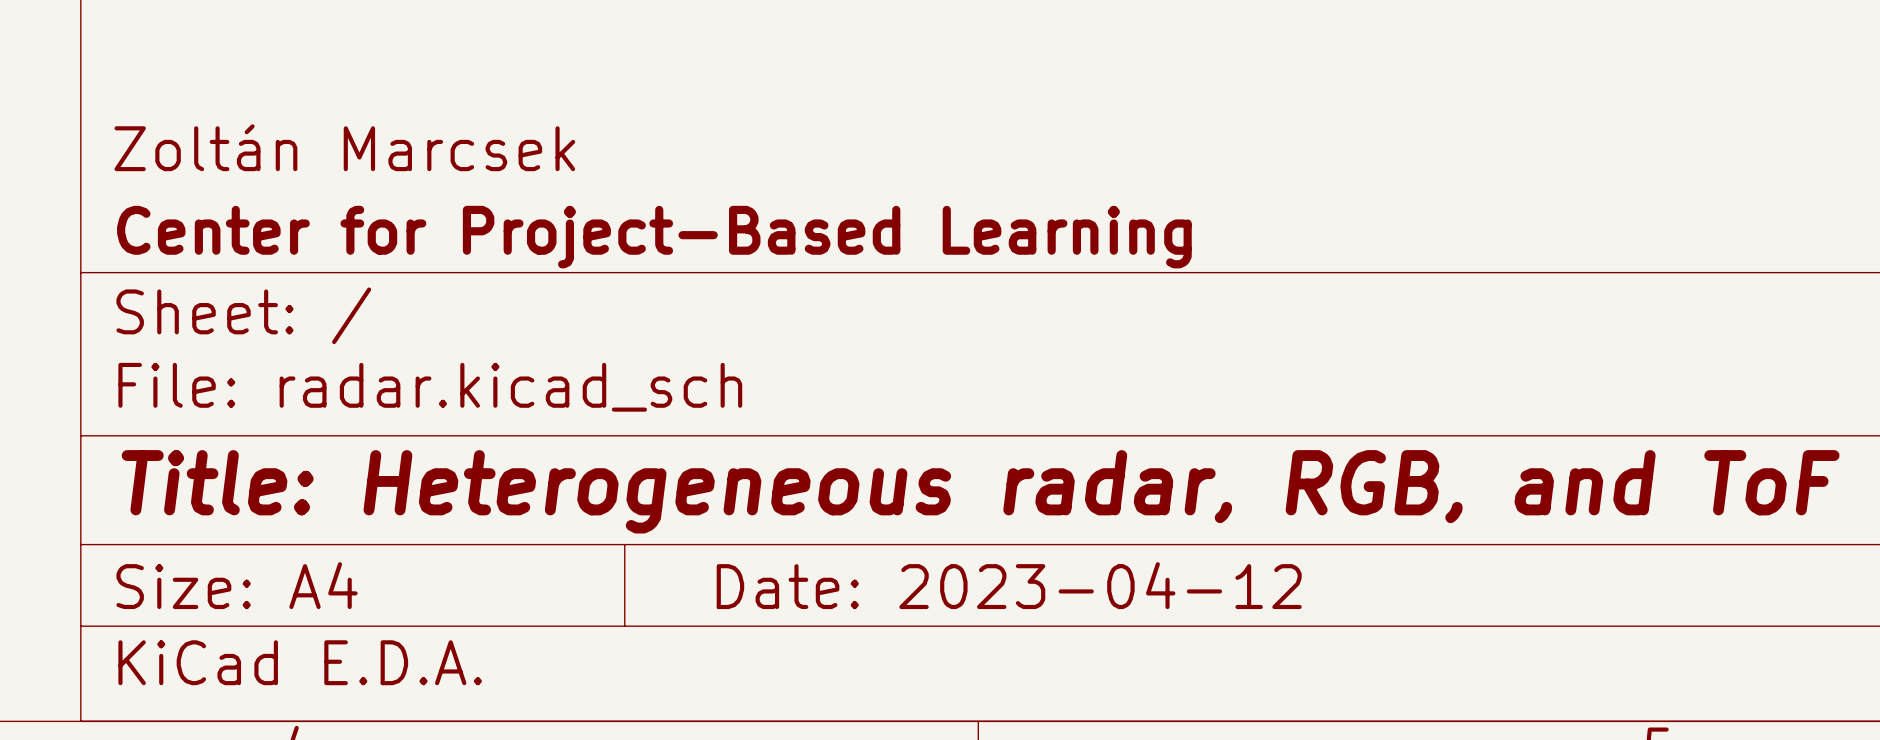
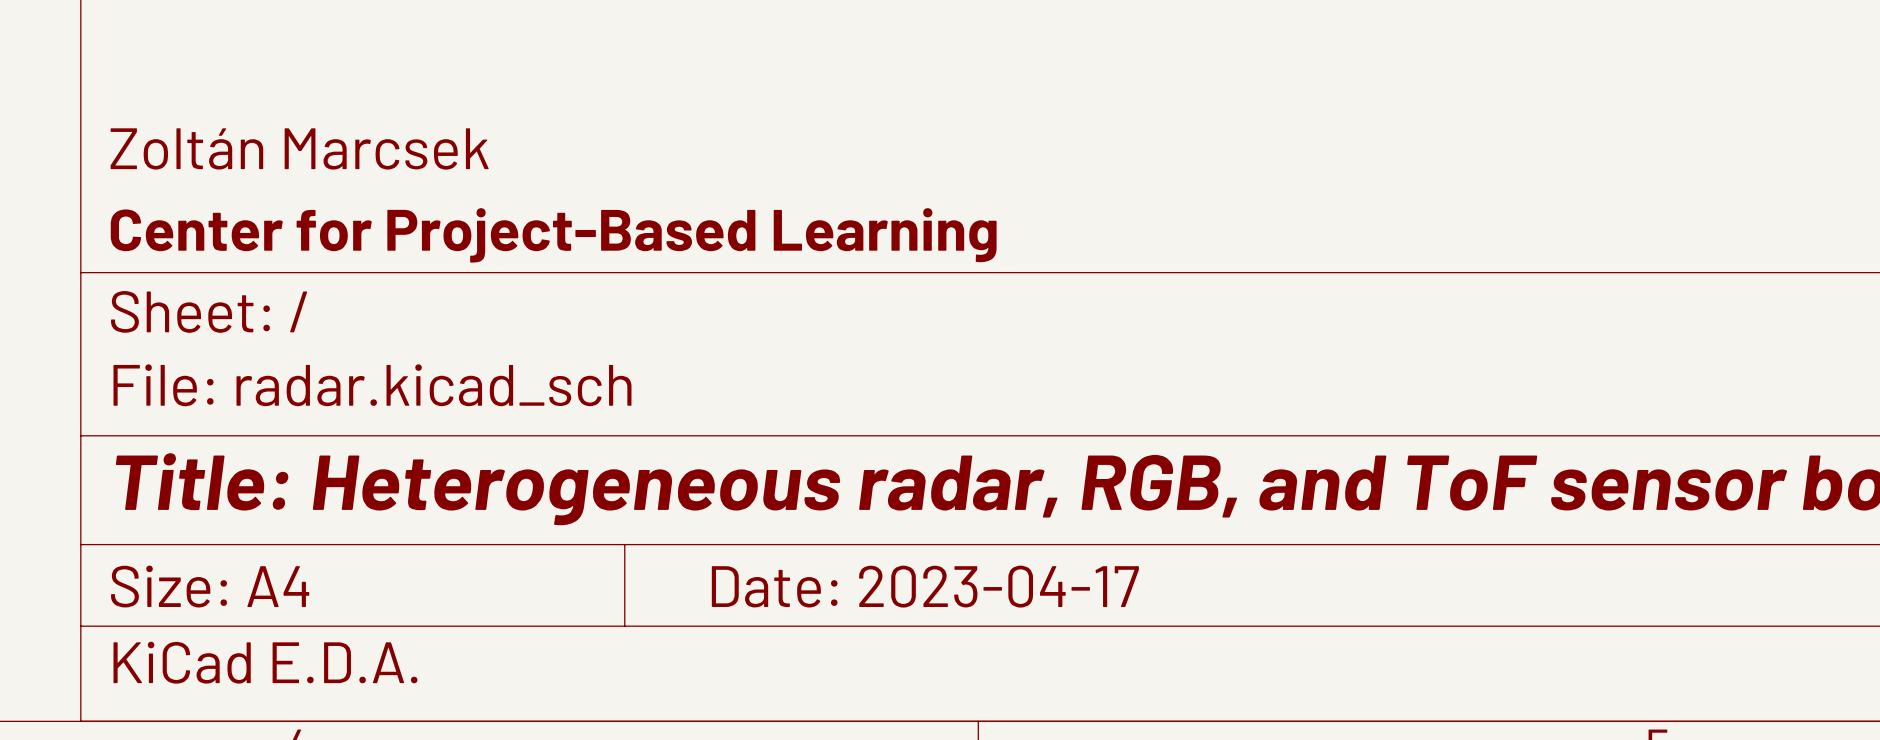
title block: Date: 2023-04-12 (1009, 585) -> Date: 2023-04-17 (925, 586)

